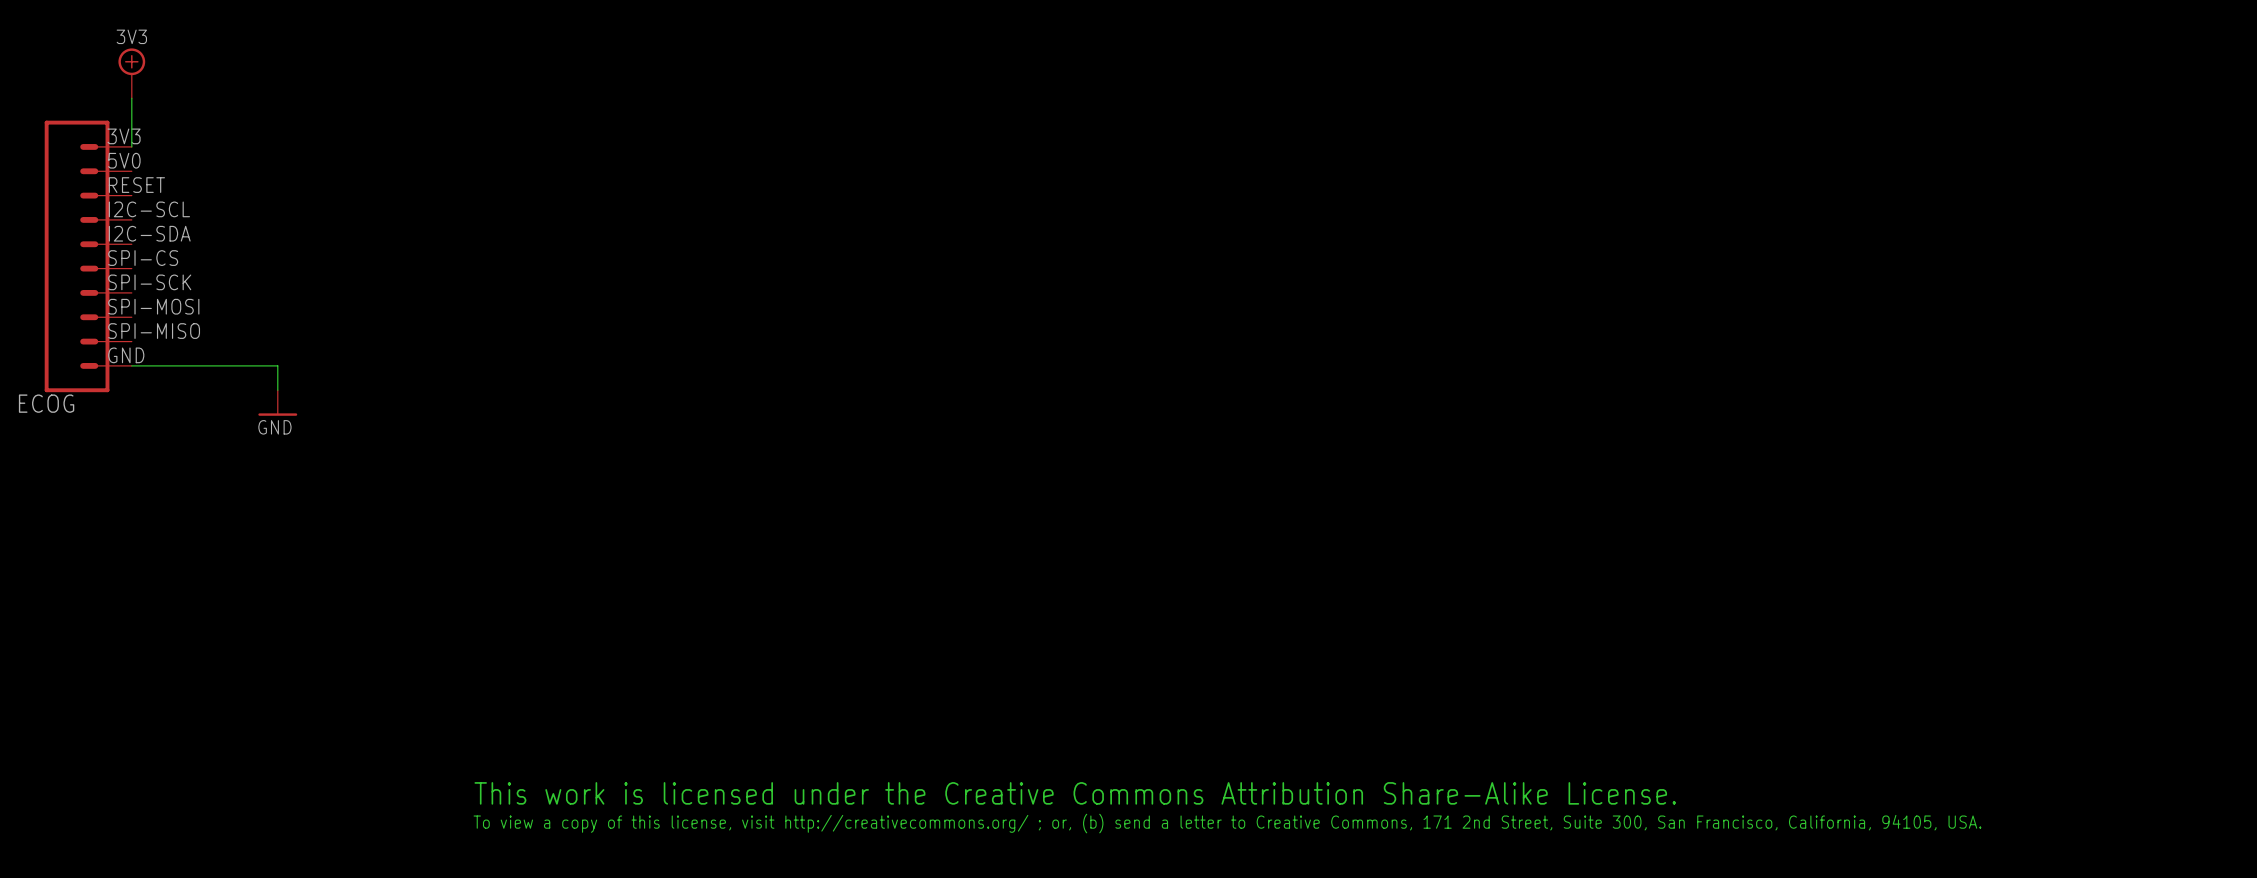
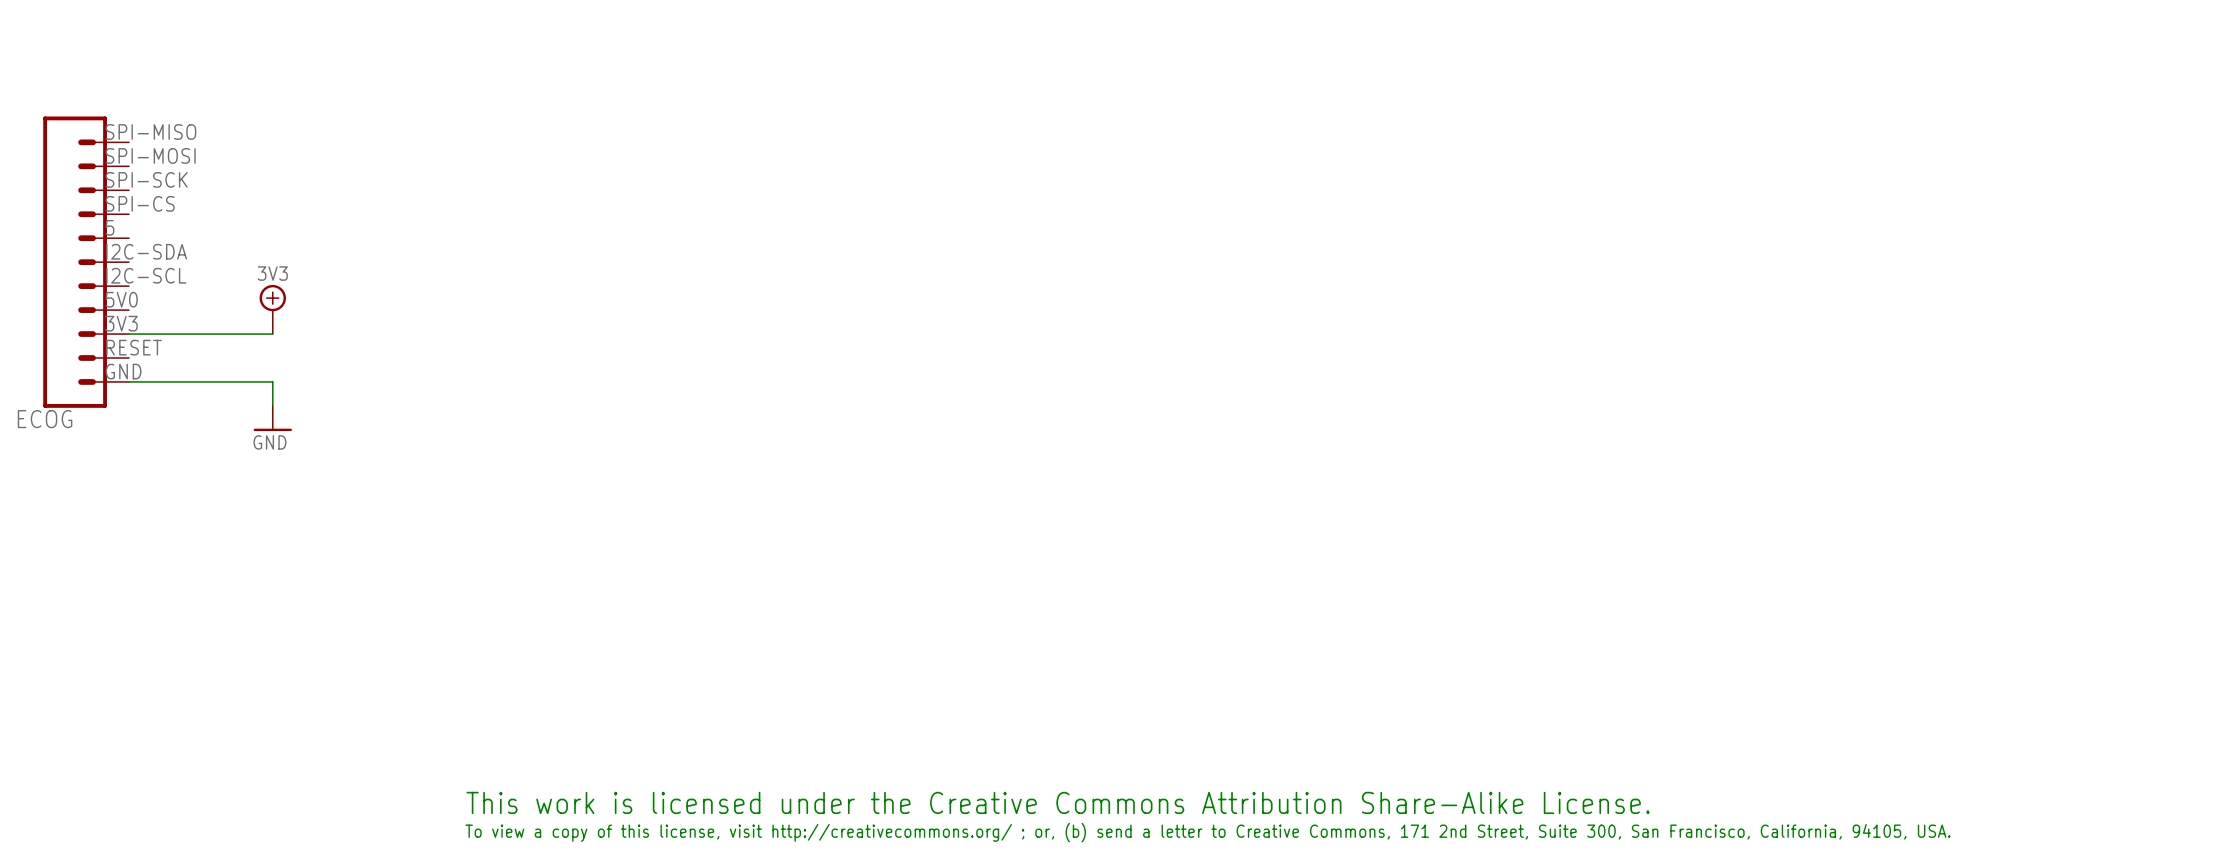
power symbol: 3V3 (131, 73) -> none
wire: (131, 98) (131, 146) -> none
ECOG: none -> (86, 262)
ECOG: (88, 256) -> none
power symbol: none -> 3V3 (272, 309)
wire: none -> (129, 334) (272, 334)

